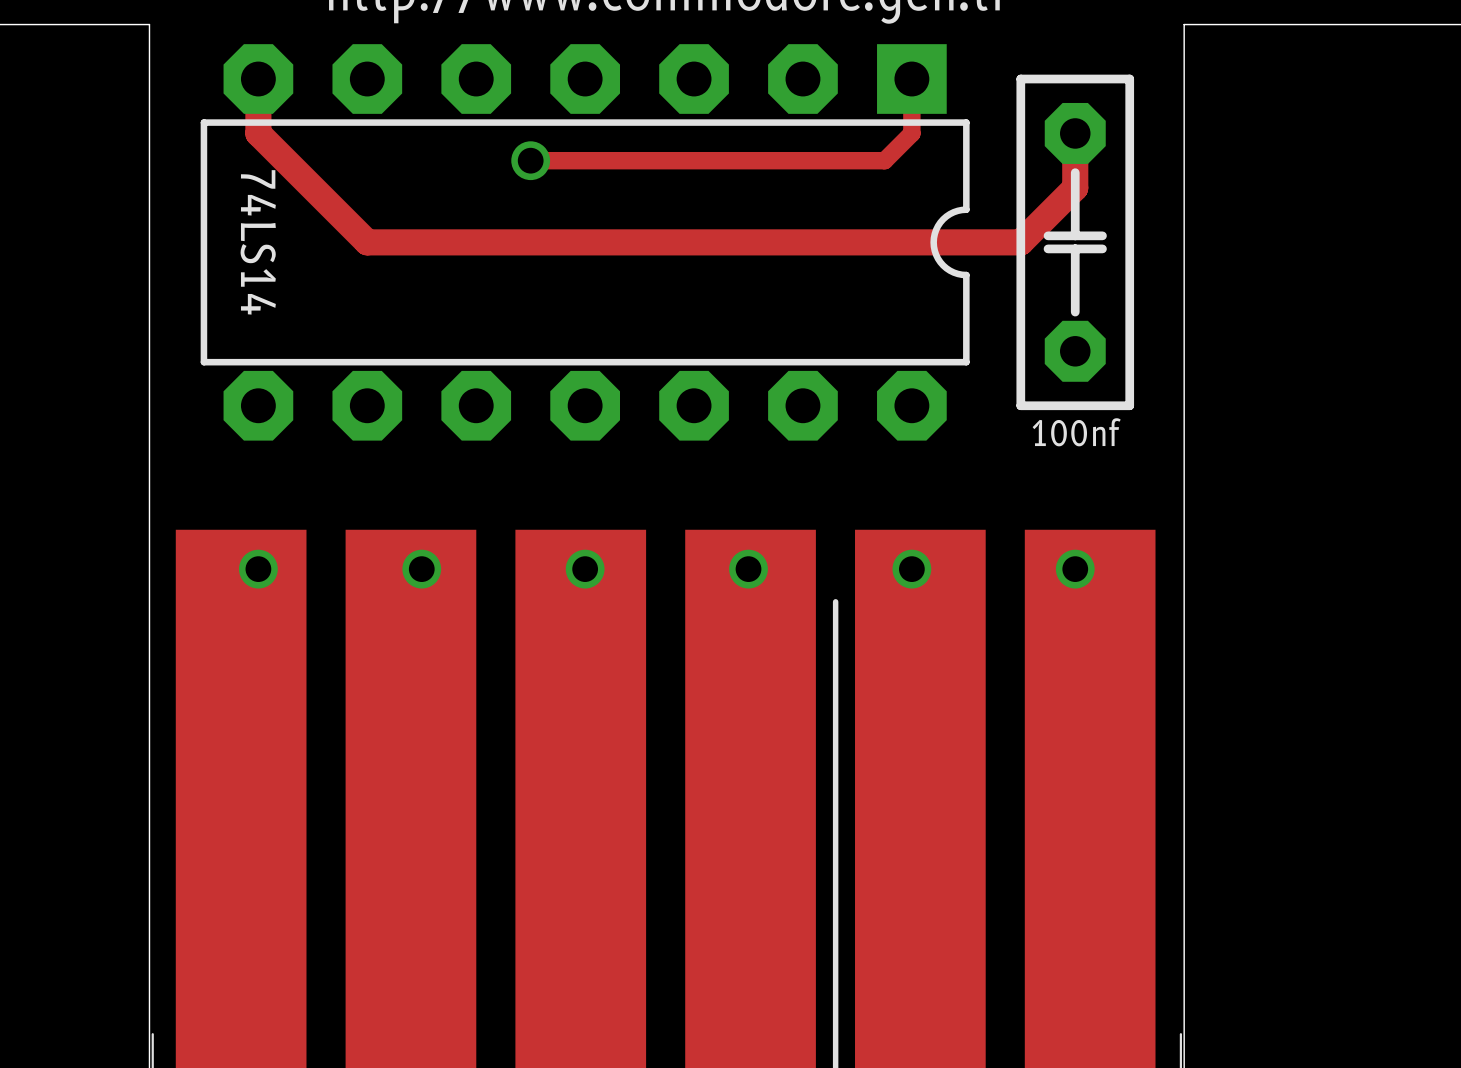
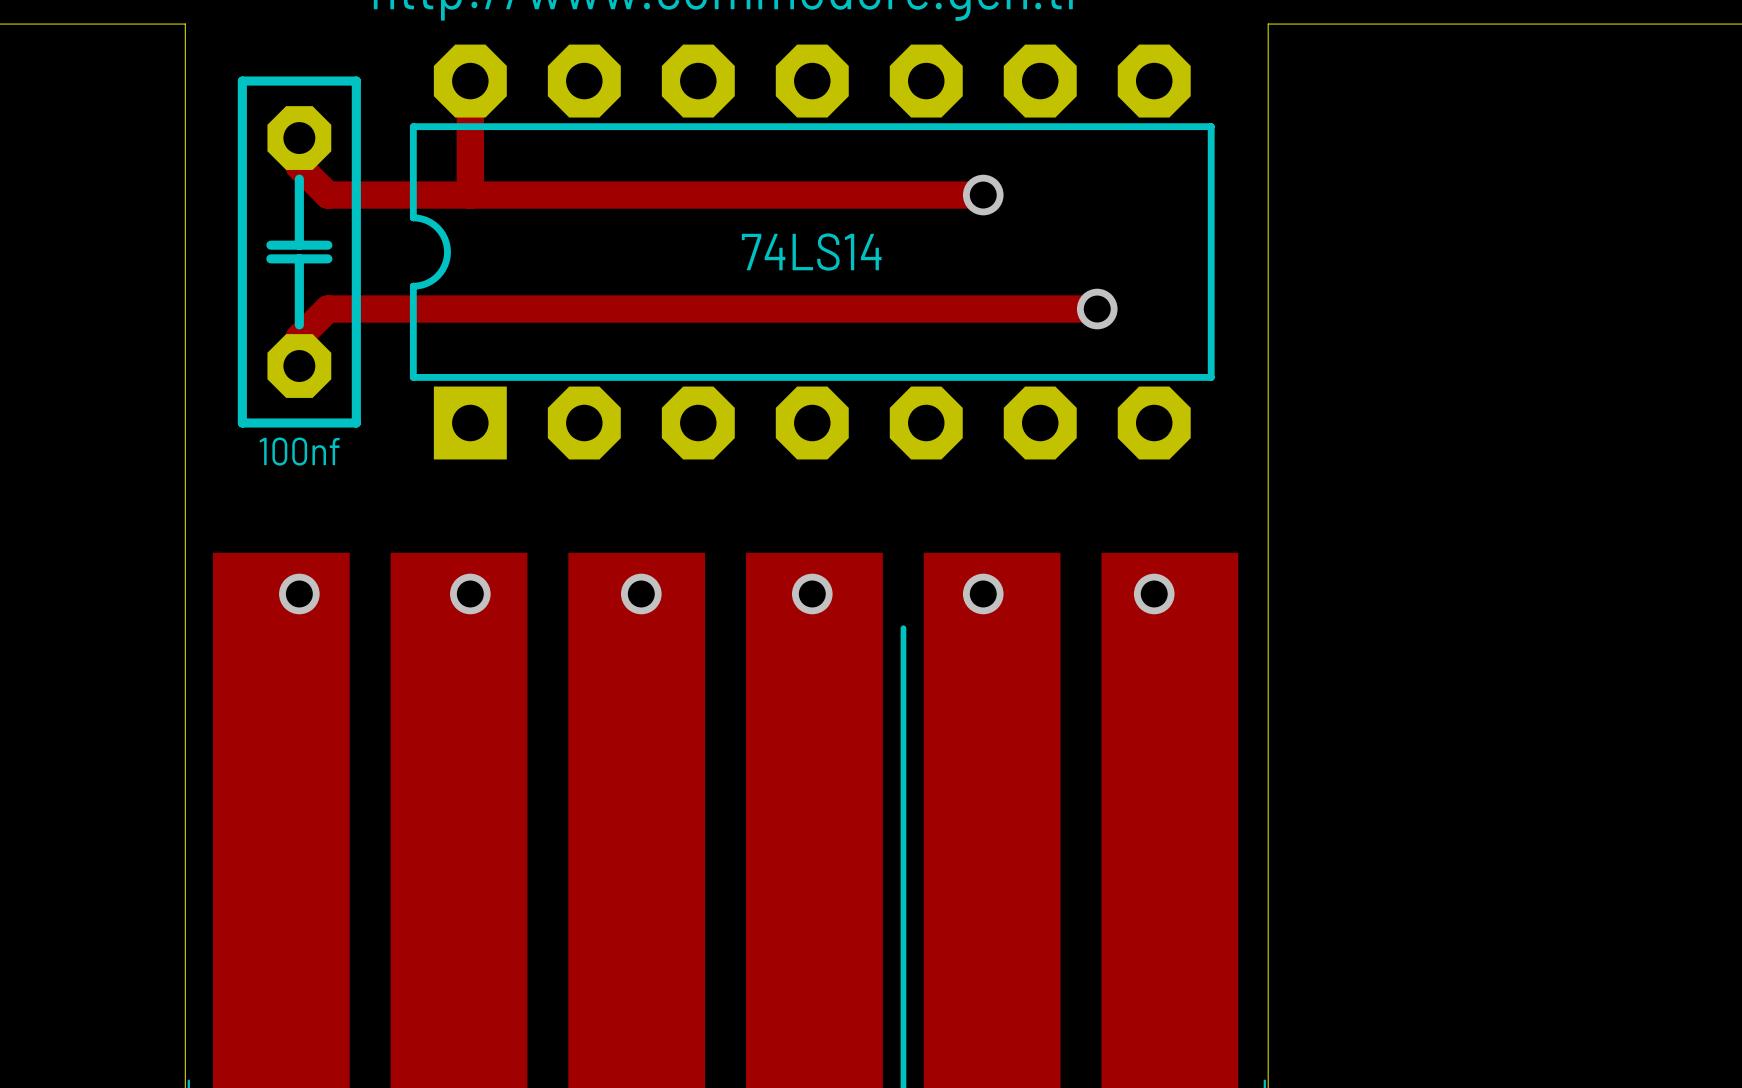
track: (258, 79) (258, 133) (367, 242) (1020, 242) (1075, 187) (1075, 133) -> none
track: none -> (470, 81) (470, 195)
track: (911, 79) (911, 133) (884, 160) (530, 160) -> none
track: none -> (299, 138) (299, 166) (327, 195) (983, 195)
via: (530, 160) -> none
via: none -> (983, 195)
part value position: 74LS14 (258, 242) -> 74LS14 (811, 252)
part rotation: 0° (585, 242) -> 180° (812, 252)
part position: (1075, 242) -> (299, 252)
track: none -> (1097, 309) (327, 309) (299, 337) (299, 366)
via: none -> (1097, 309)

